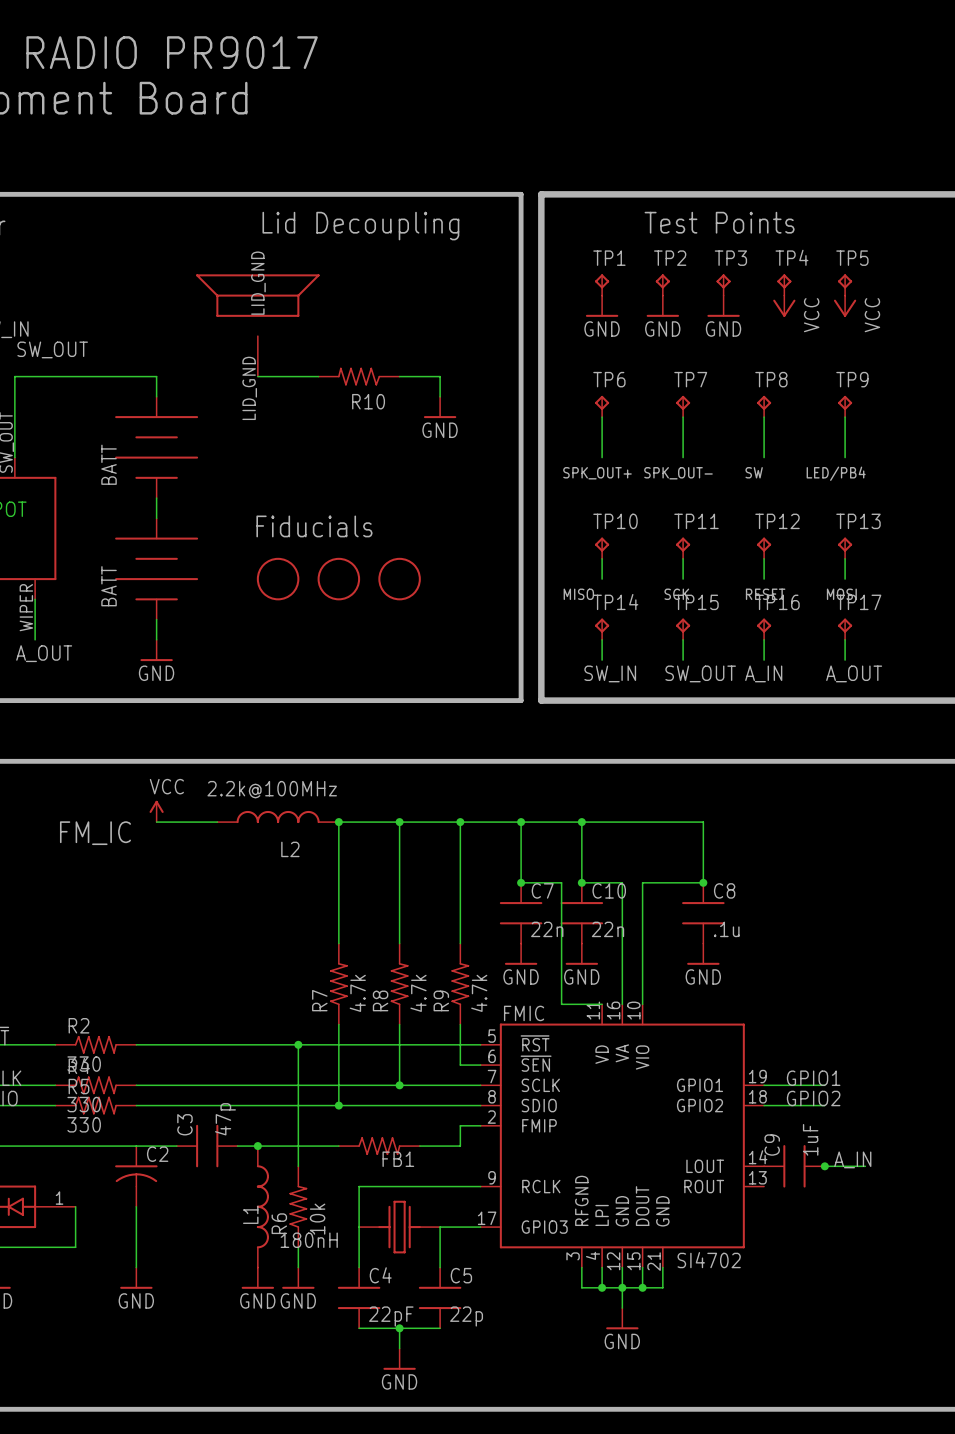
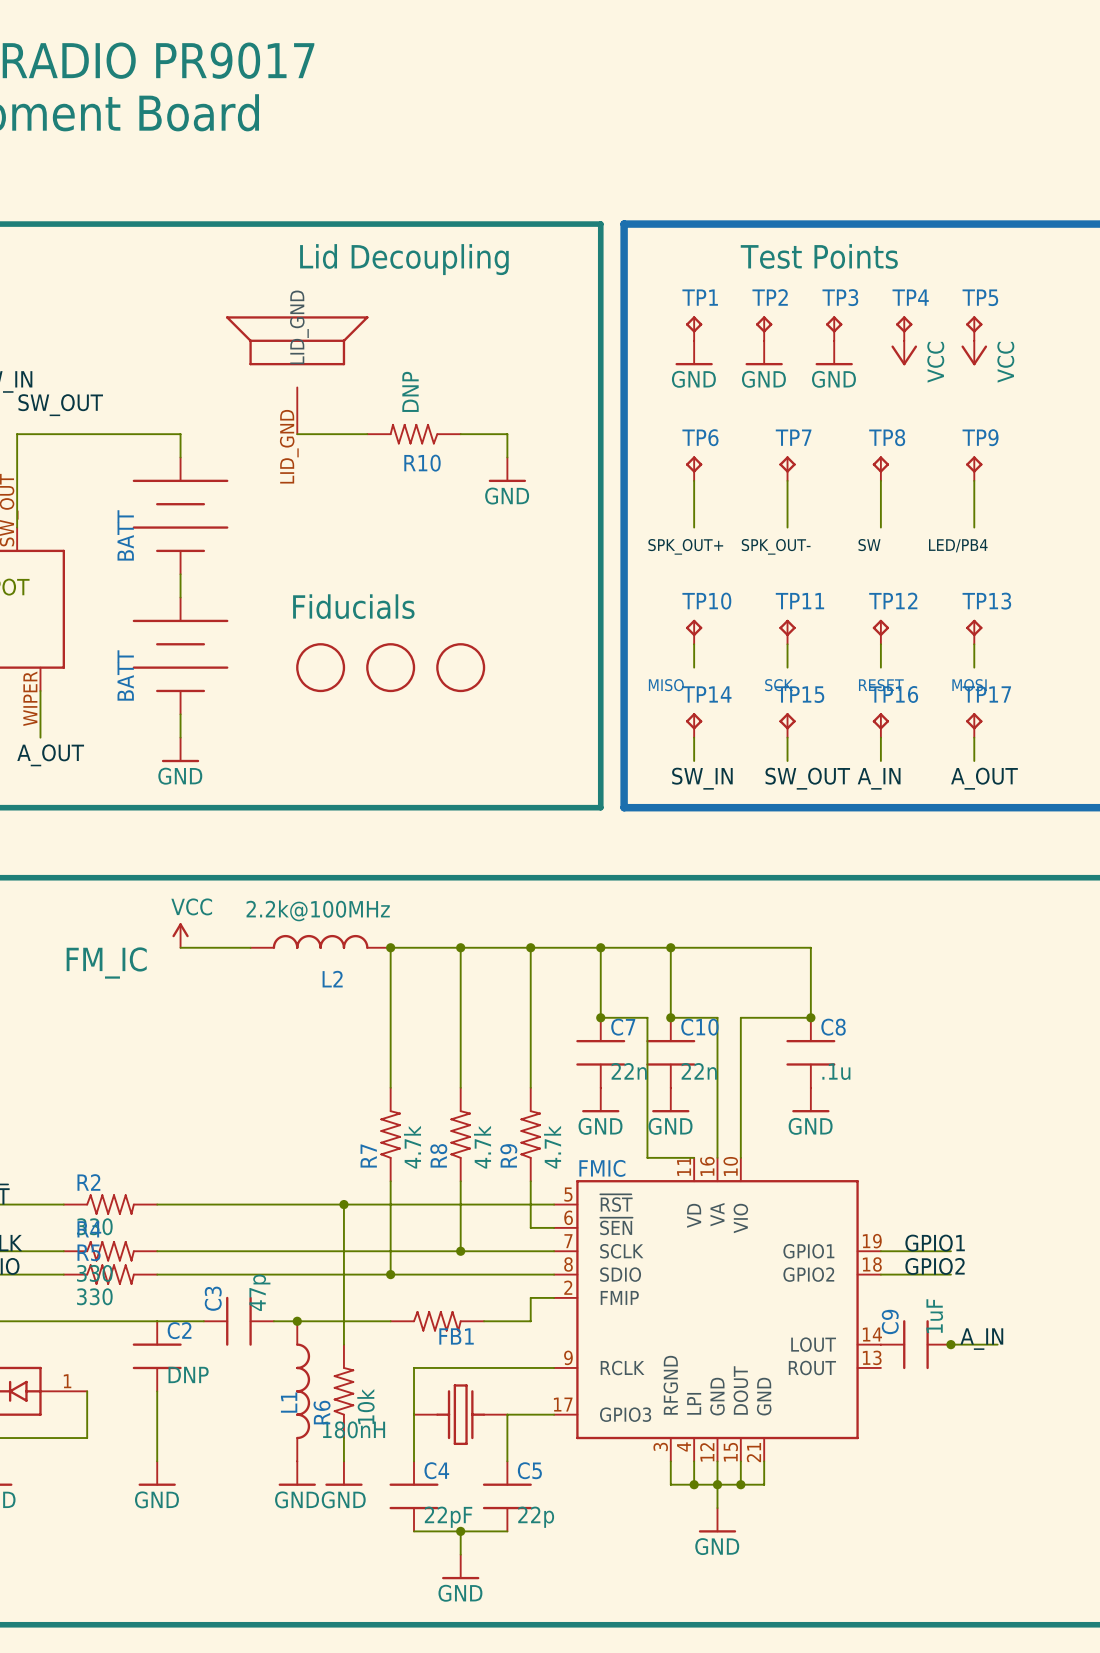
R10 value: none -> DNP (410, 391)
C2 symbol: [115, 1146, 158, 1207] -> [132, 1321, 182, 1392]
C2 value: none -> DNP (188, 1374)
FMIC value: SI4702 (709, 1260) -> none

